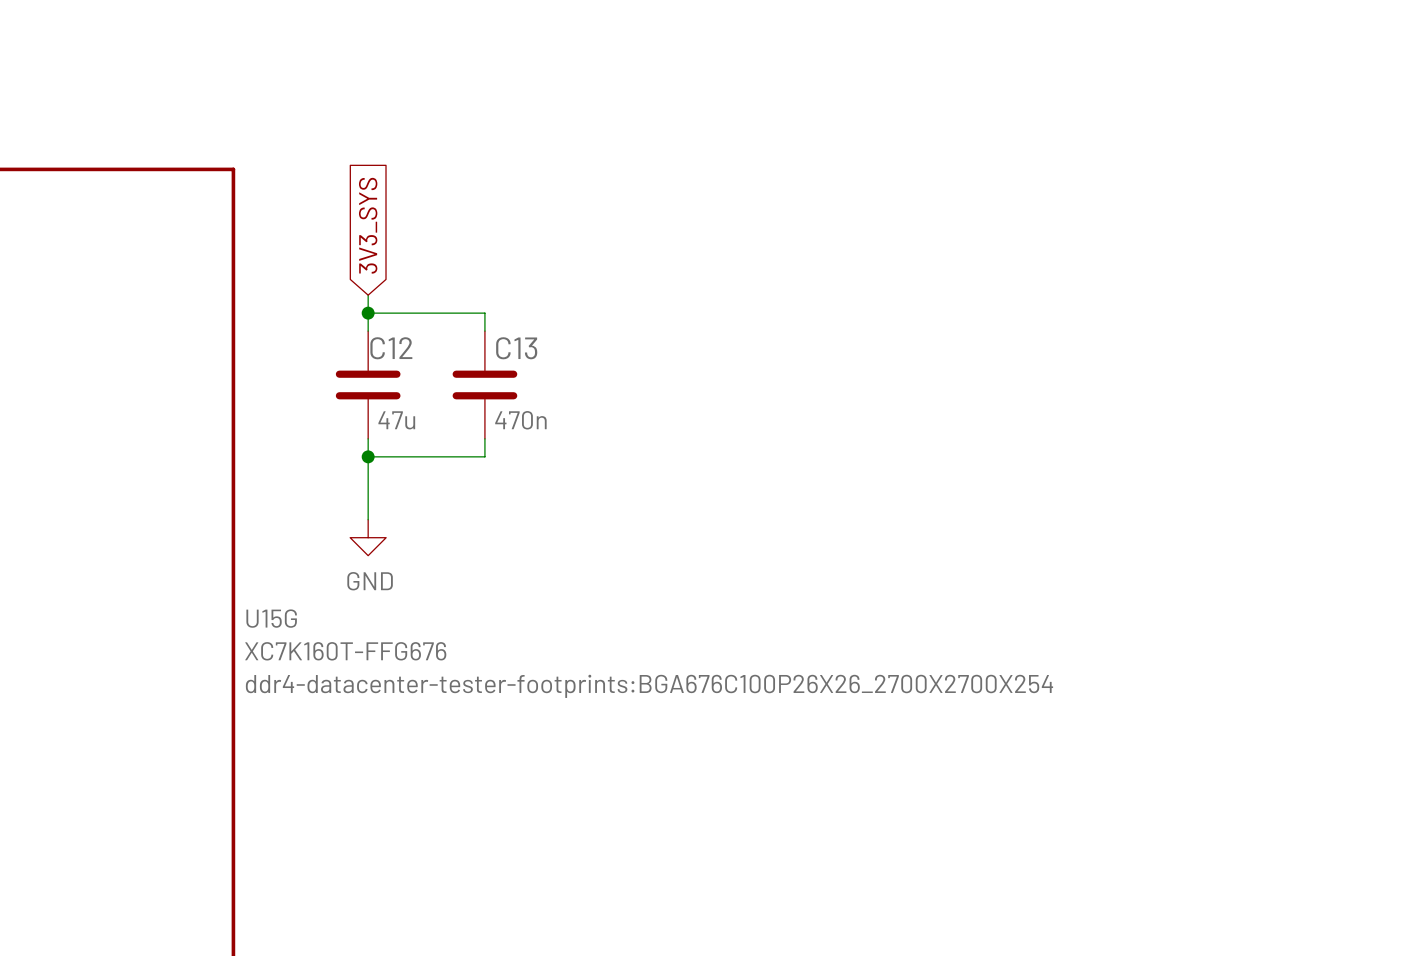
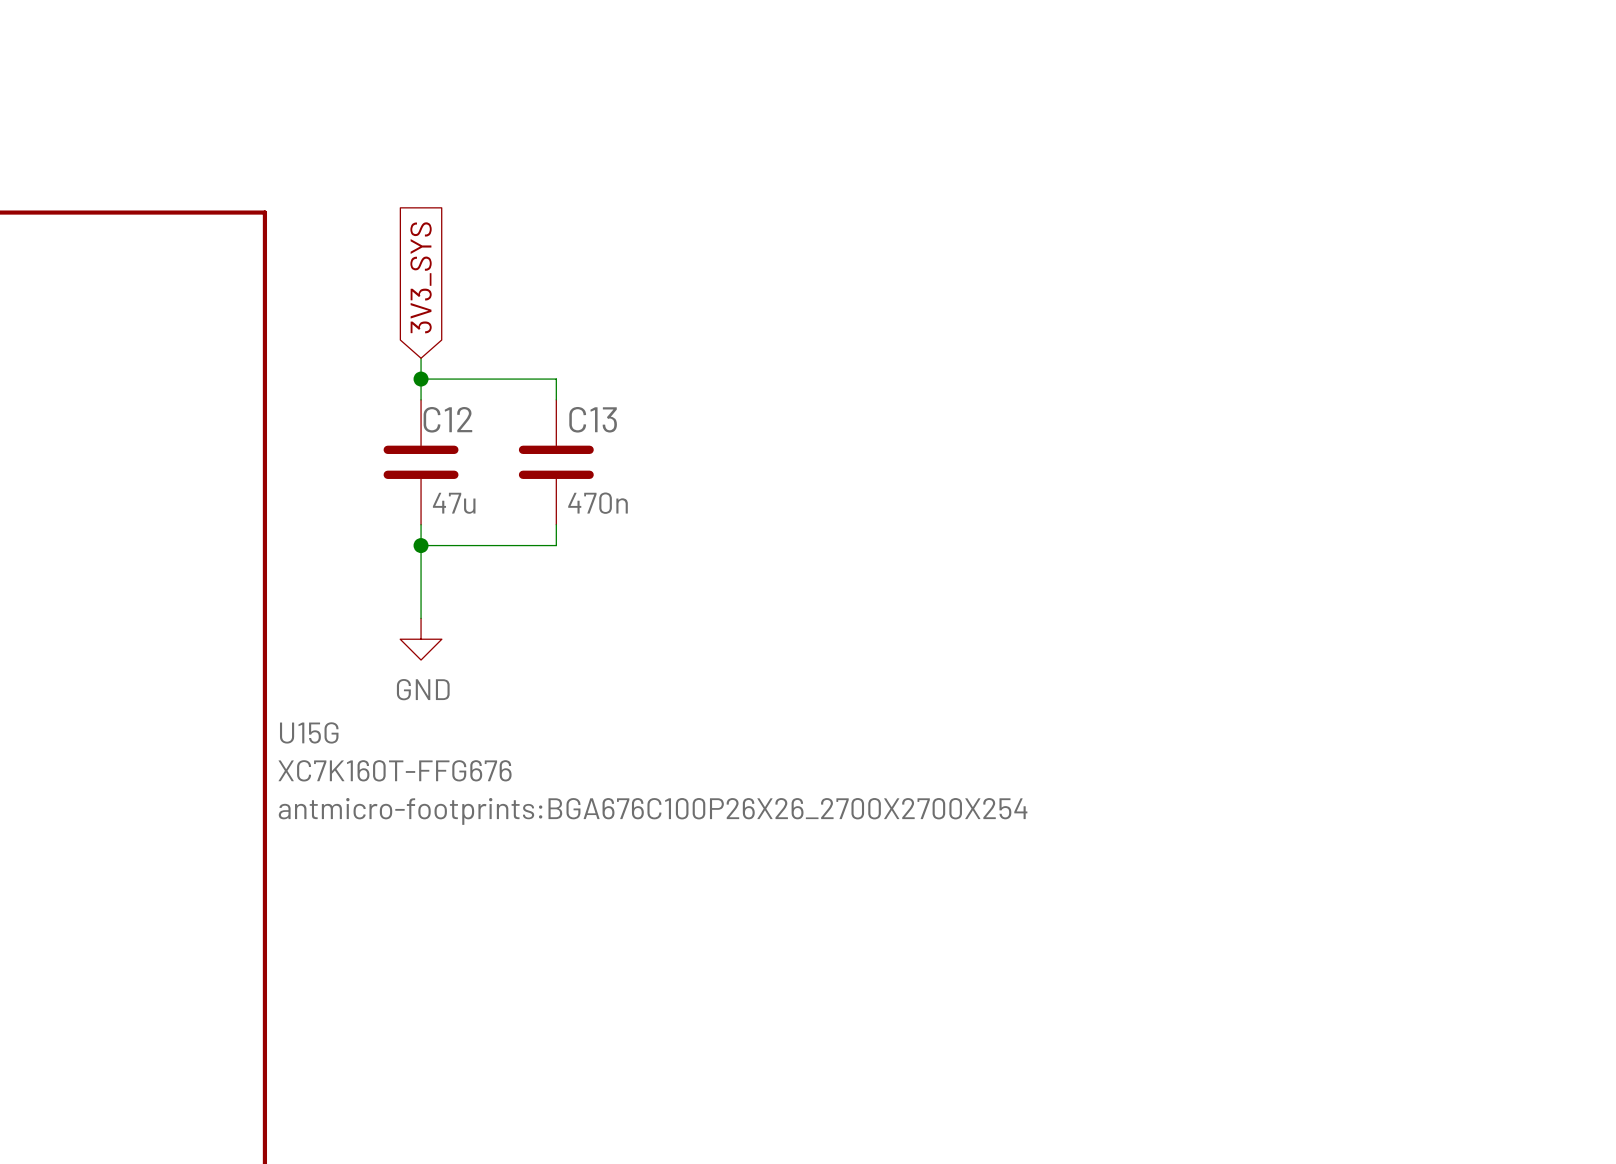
U15G text: ddr4-datacenter-tester-footprints:BGA676C100P26X26_2700X2700X254 (649, 686) -> antmicro-footprints:BGA676C100P26X26_2700X2700X254 (653, 811)

